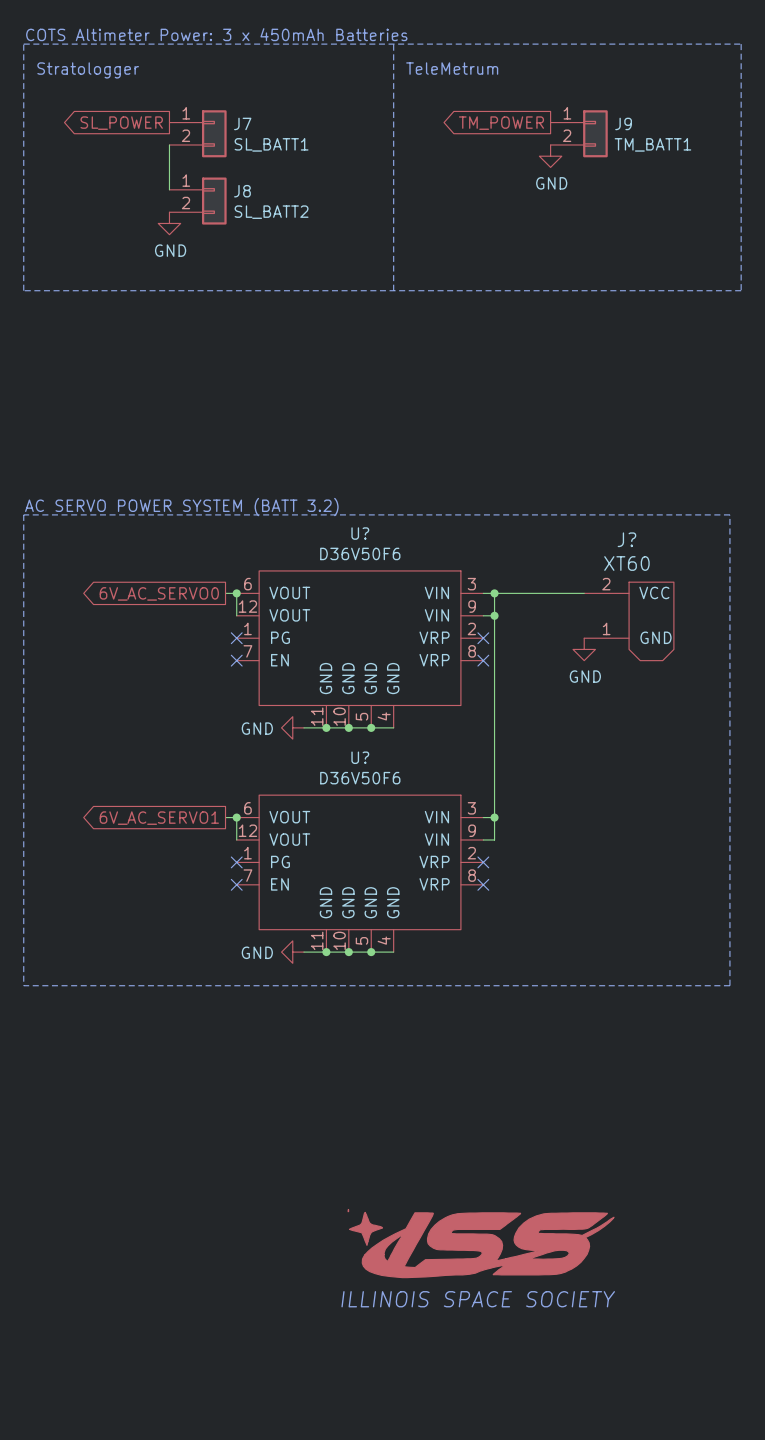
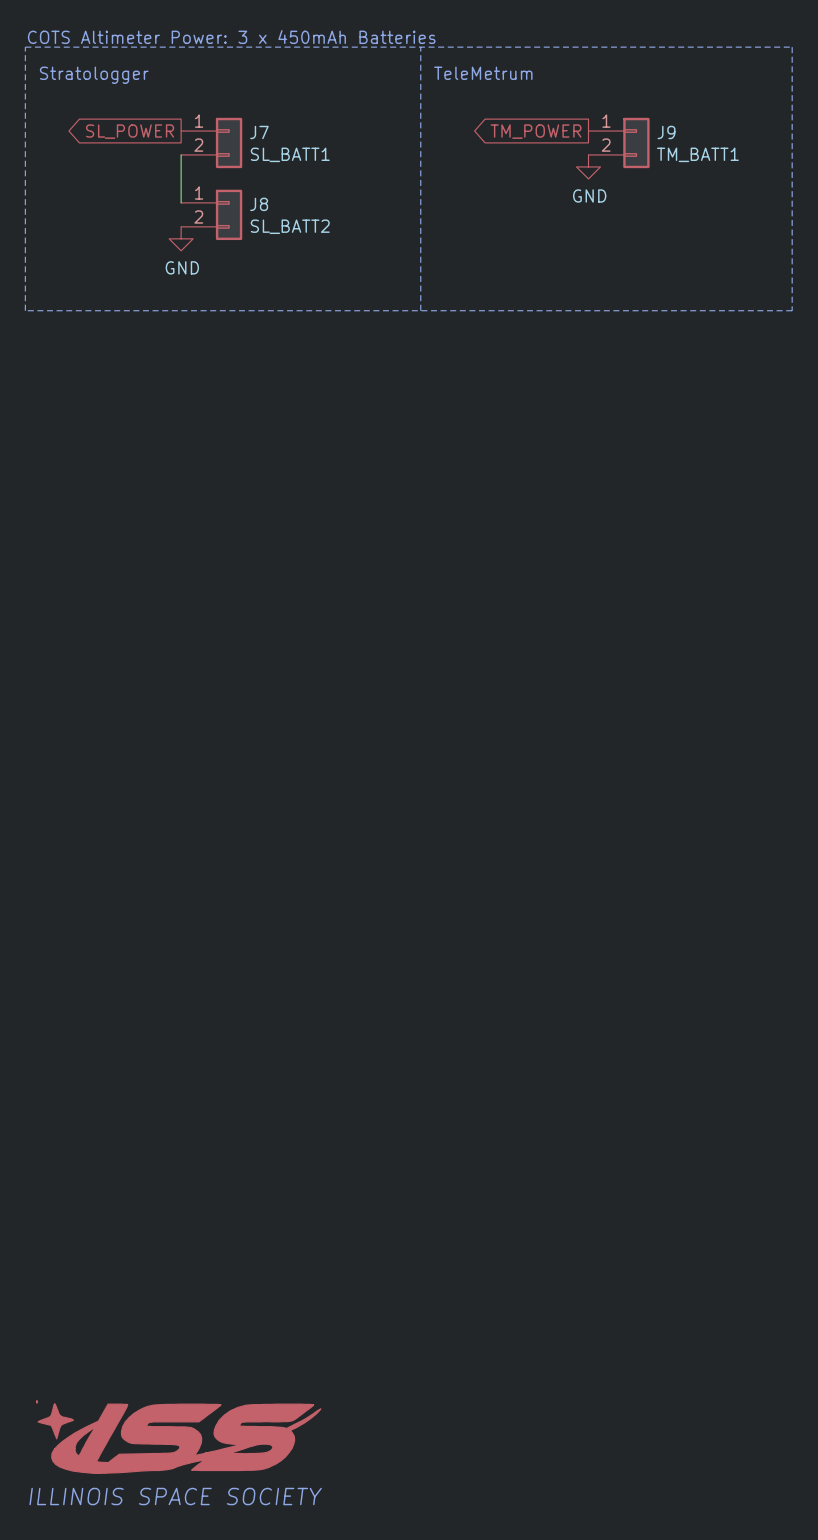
text: AC SERVO POWER SYSTEM (BATT 3.2) (181, 507) -> none
line: (23, 514) (23, 985) (729, 985) (729, 514) (23, 514) -> none
global label: 6V_AC_SERVO0 (159, 593) -> none
wire: (225, 593) (236, 593) (236, 615) -> none
junction: (236, 593) -> none
wire: (483, 593) (584, 593) -> none
wire: (494, 593) (494, 839) (483, 839) -> none
junction: (494, 593) -> none
wire: (483, 615) (494, 615) -> none
junction: (494, 615) -> none
J?: XT60 (629, 621) -> none
no-connect mark: (236, 638) -> none
no-connect mark: (483, 638) -> none
U?: D36V50F6 (360, 649) -> none
power symbol: GND (584, 649) -> none
no-connect mark: (236, 660) -> none
no-connect mark: (483, 660) -> none
power symbol: GND (292, 727) -> none
wire: (303, 727) (393, 727) -> none
junction: (326, 727) -> none
junction: (348, 727) -> none
junction: (371, 727) -> none
wire: (225, 817) (236, 817) (236, 839) -> none
junction: (236, 817) -> none
wire: (483, 817) (494, 817) -> none
junction: (494, 817) -> none
global label: 6V_AC_SERVO1 (159, 818) -> none
no-connect mark: (236, 862) -> none
no-connect mark: (483, 862) -> none
U?: D36V50F6 (360, 873) -> none
no-connect mark: (236, 884) -> none
no-connect mark: (483, 884) -> none
power symbol: GND (292, 952) -> none
wire: (303, 952) (393, 952) -> none
junction: (326, 952) -> none
junction: (348, 952) -> none
junction: (371, 952) -> none
power symbol: (481, 1243) -> none
text: ILLINOIS SPACE SOCIETY (478, 1299) -> none
power symbol: none -> (178, 1436)
text: none -> ILLINOIS SPACE SOCIETY (175, 1496)

